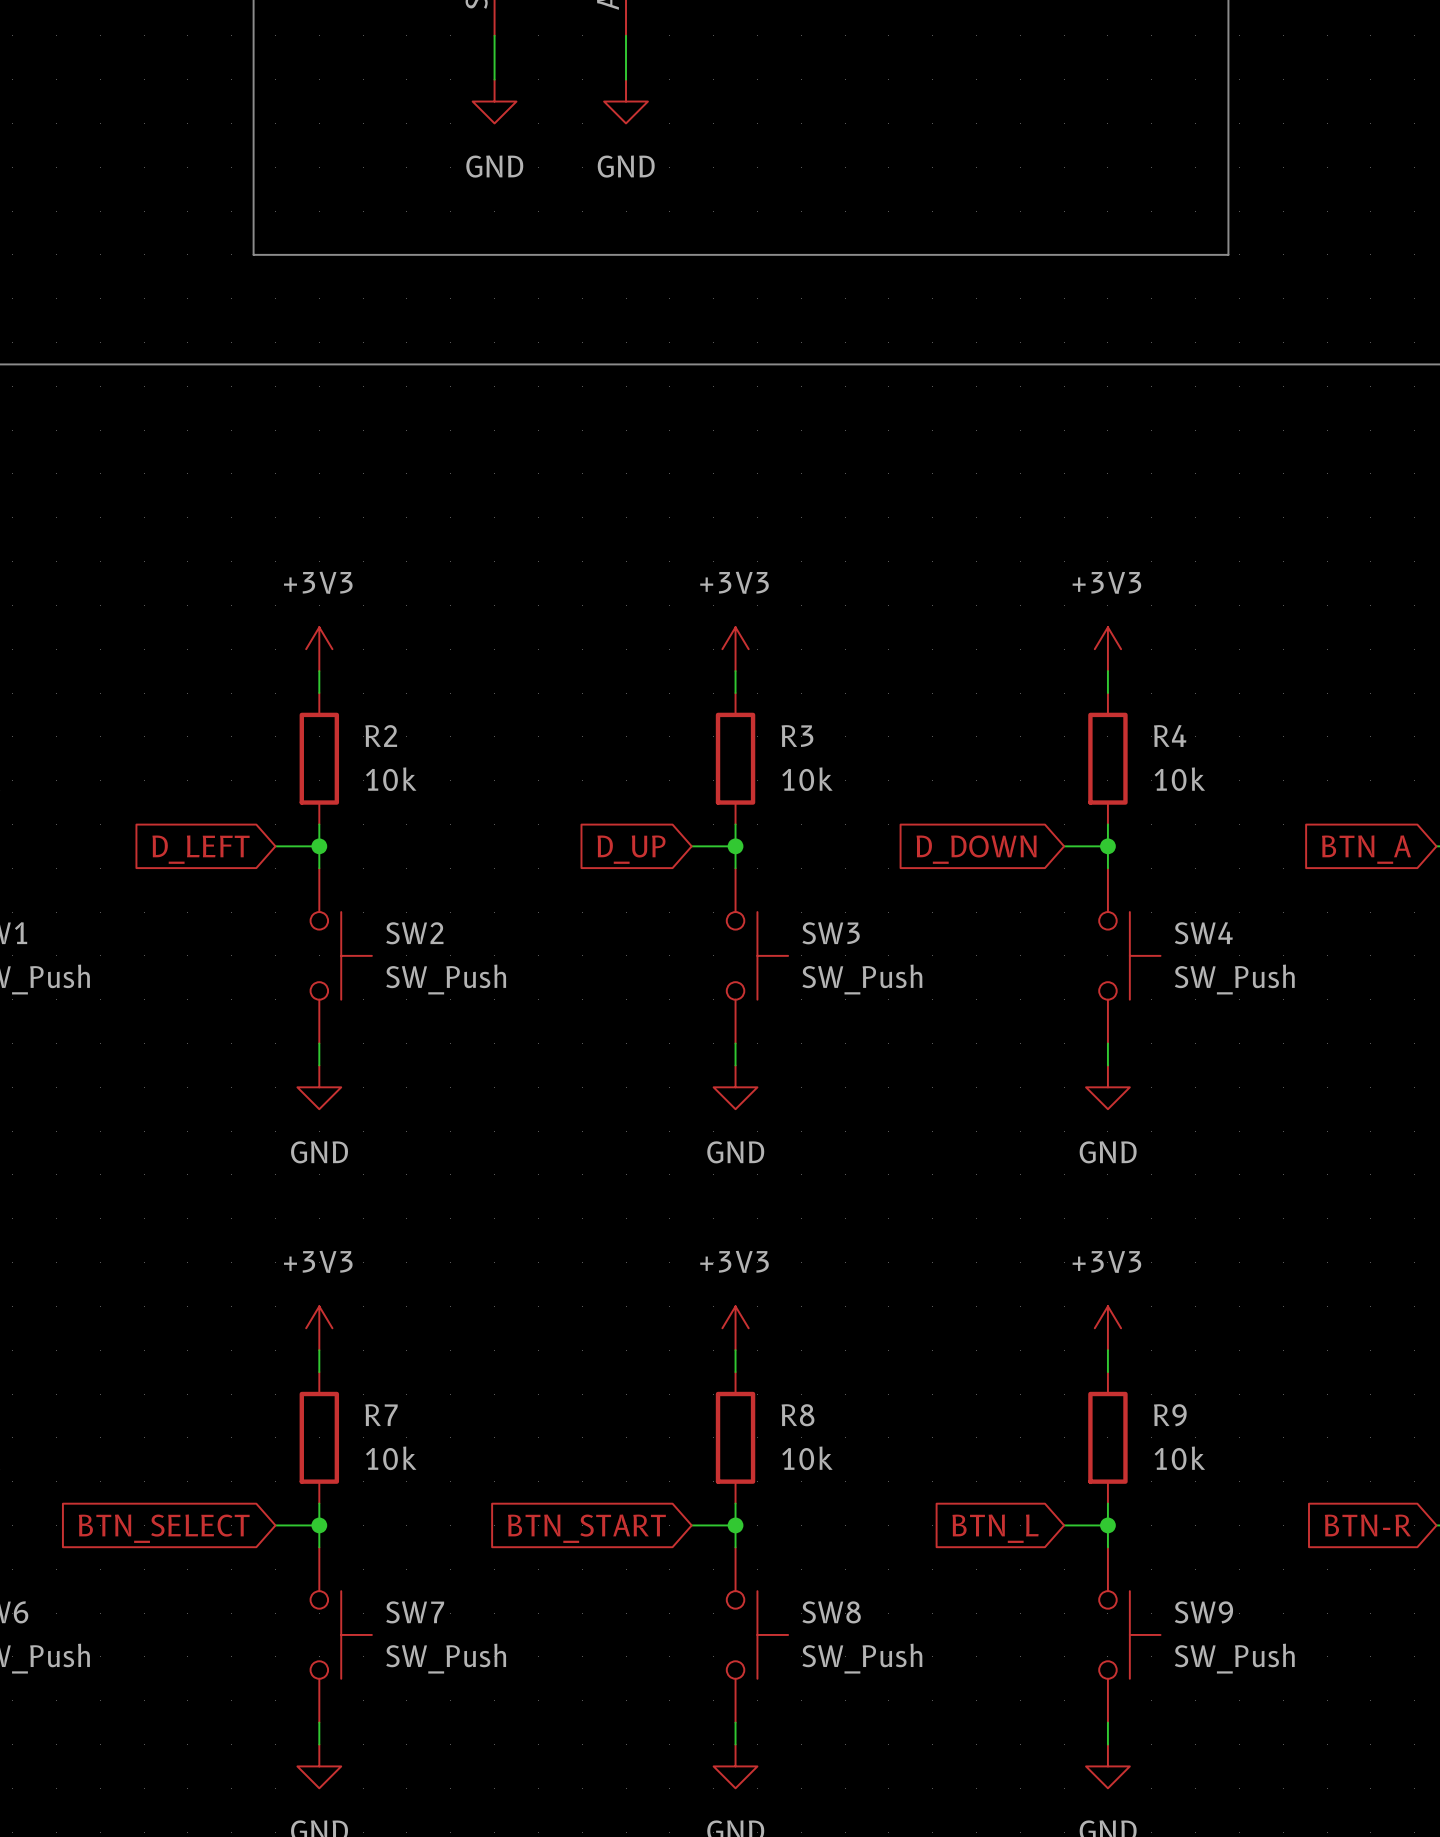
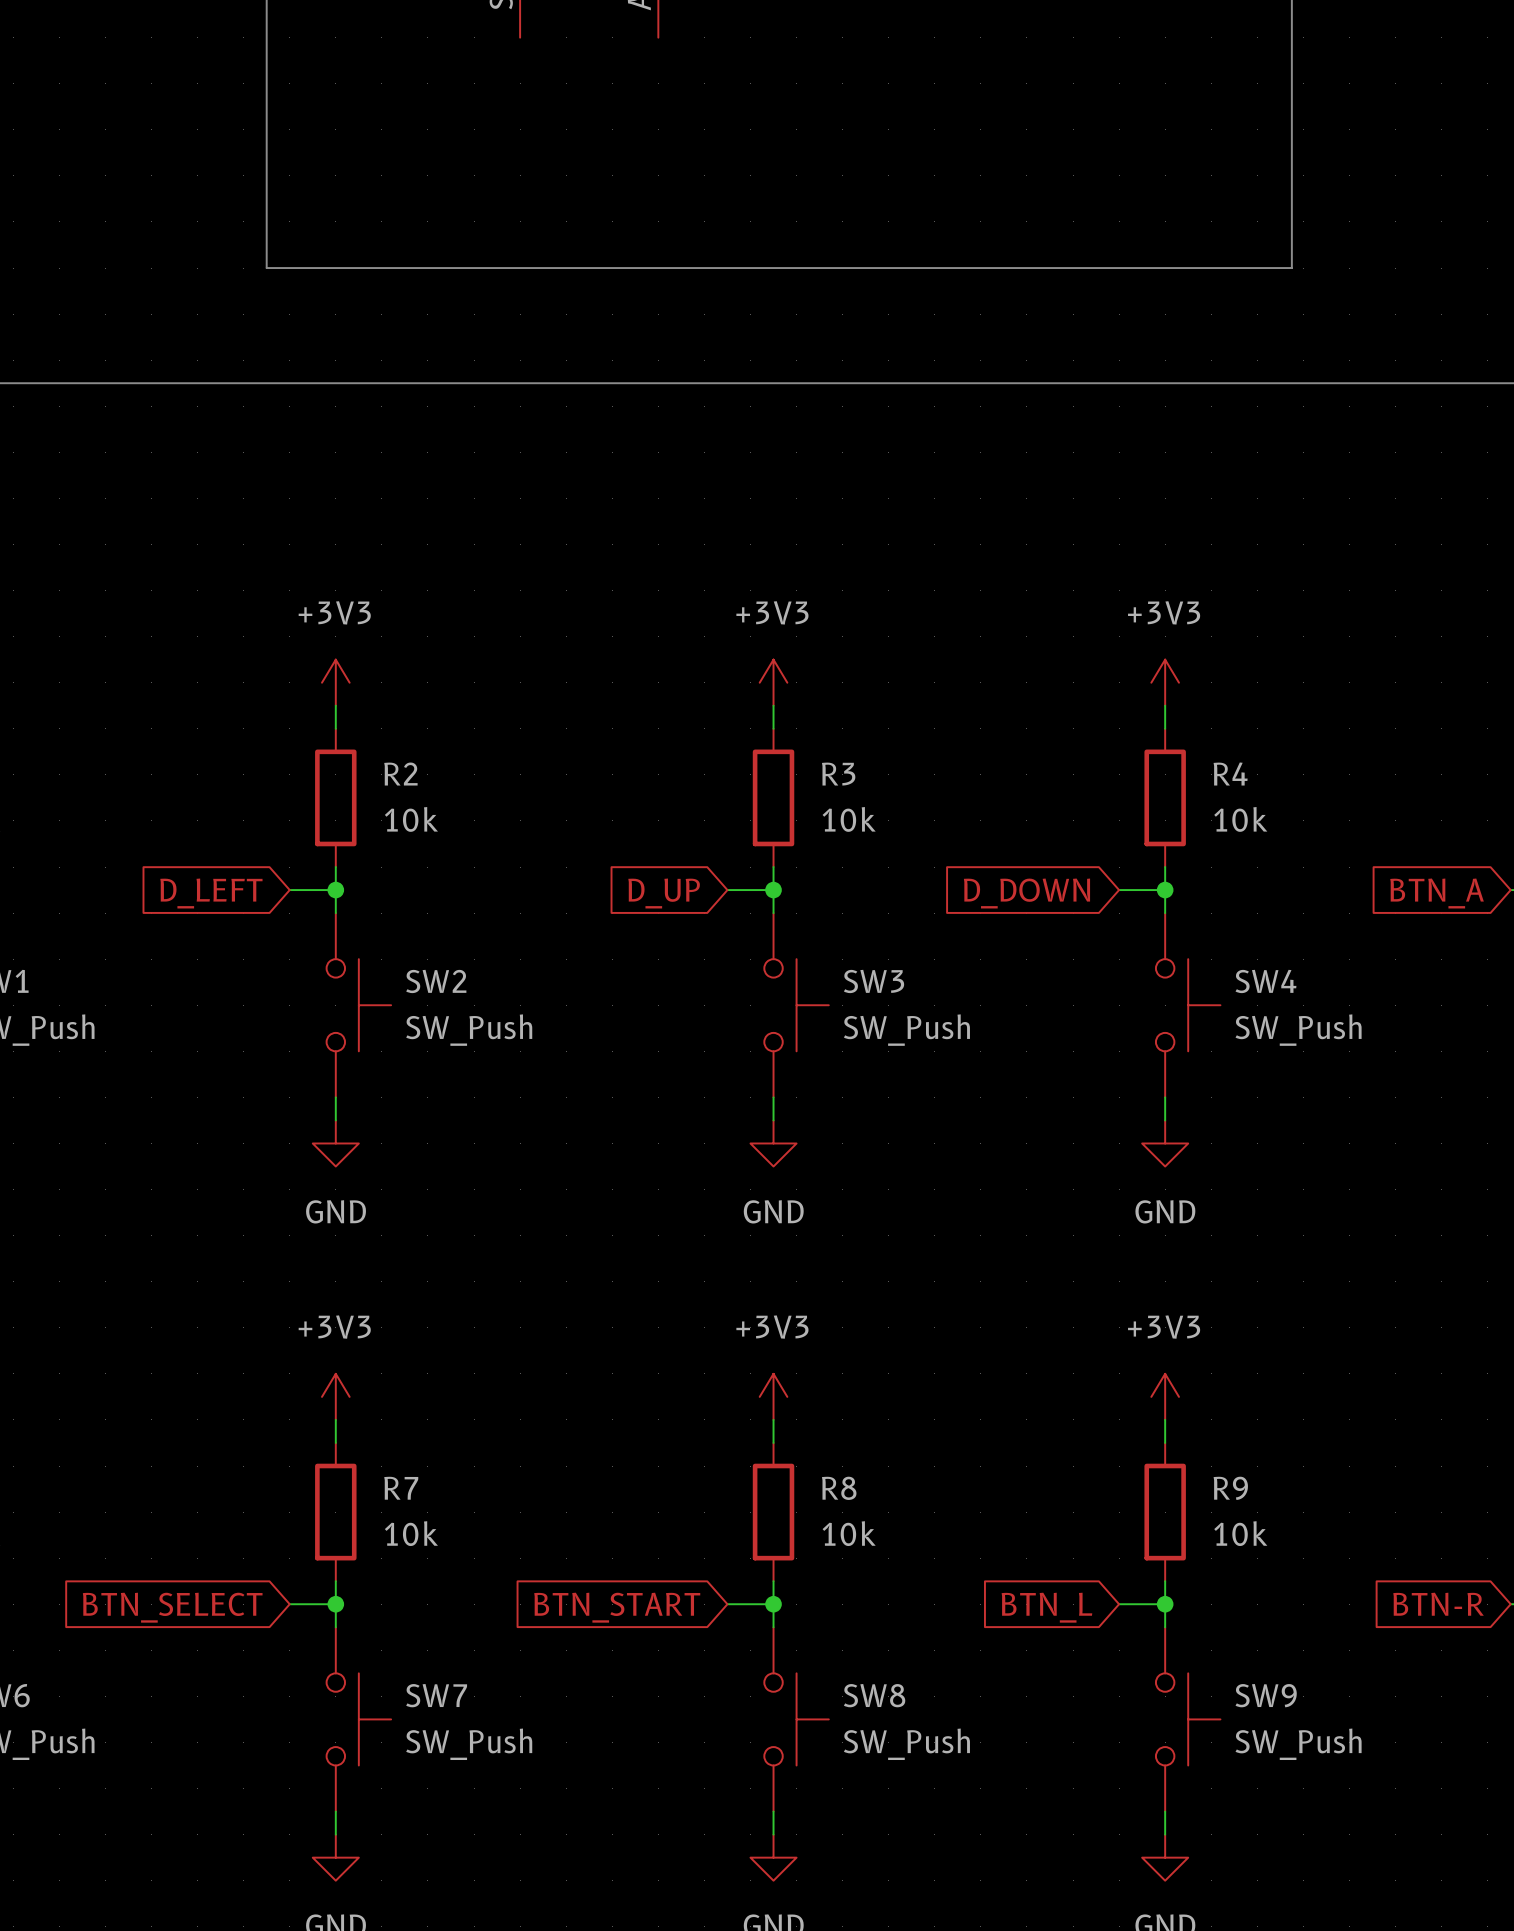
wire: (494, 35) (494, 79) -> none
wire: (626, 35) (626, 79) -> none
power symbol: GND (494, 101) -> none
power symbol: GND (626, 101) -> none

